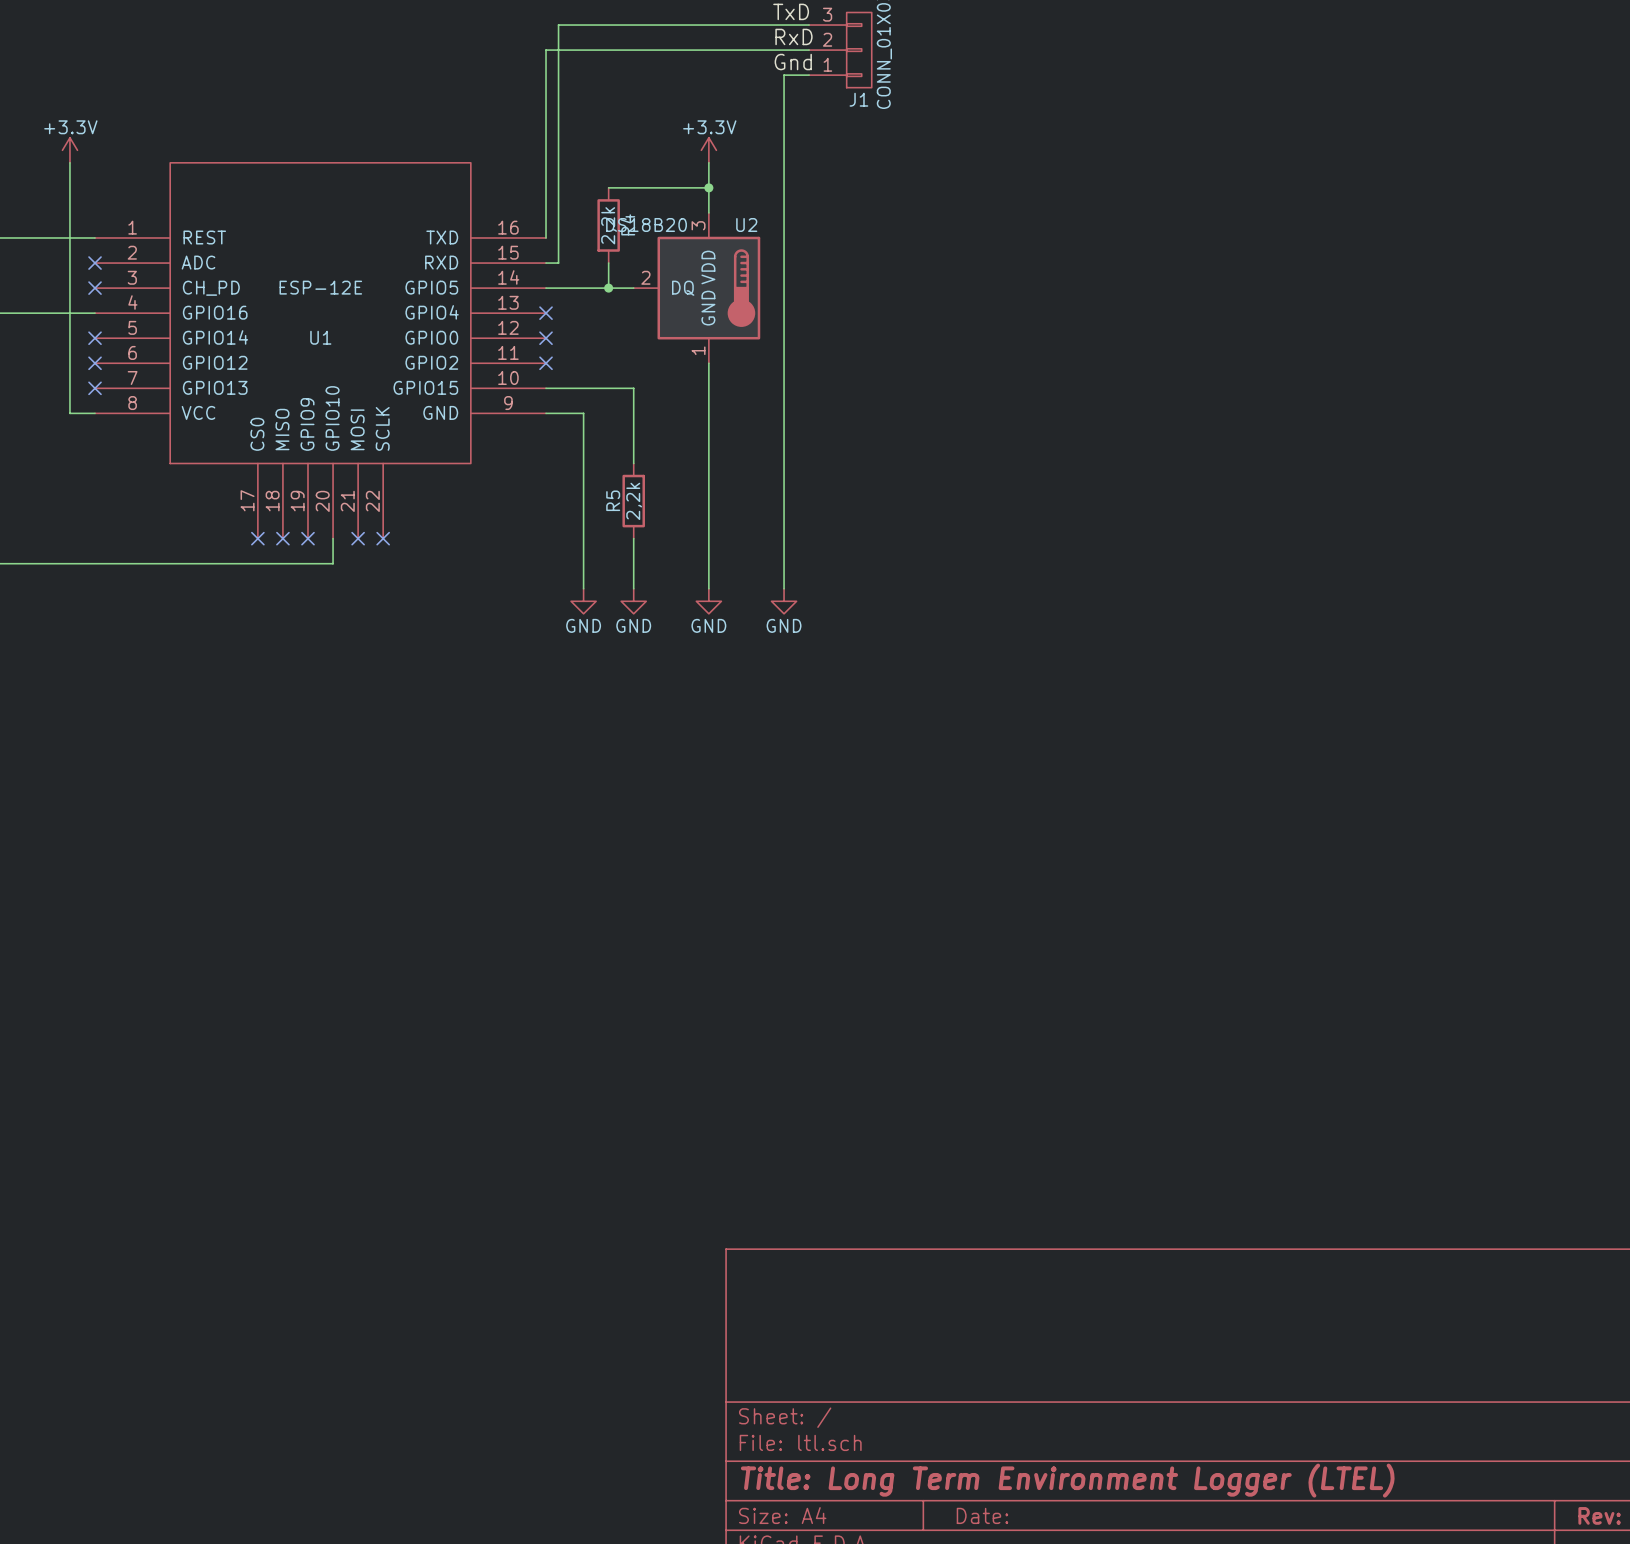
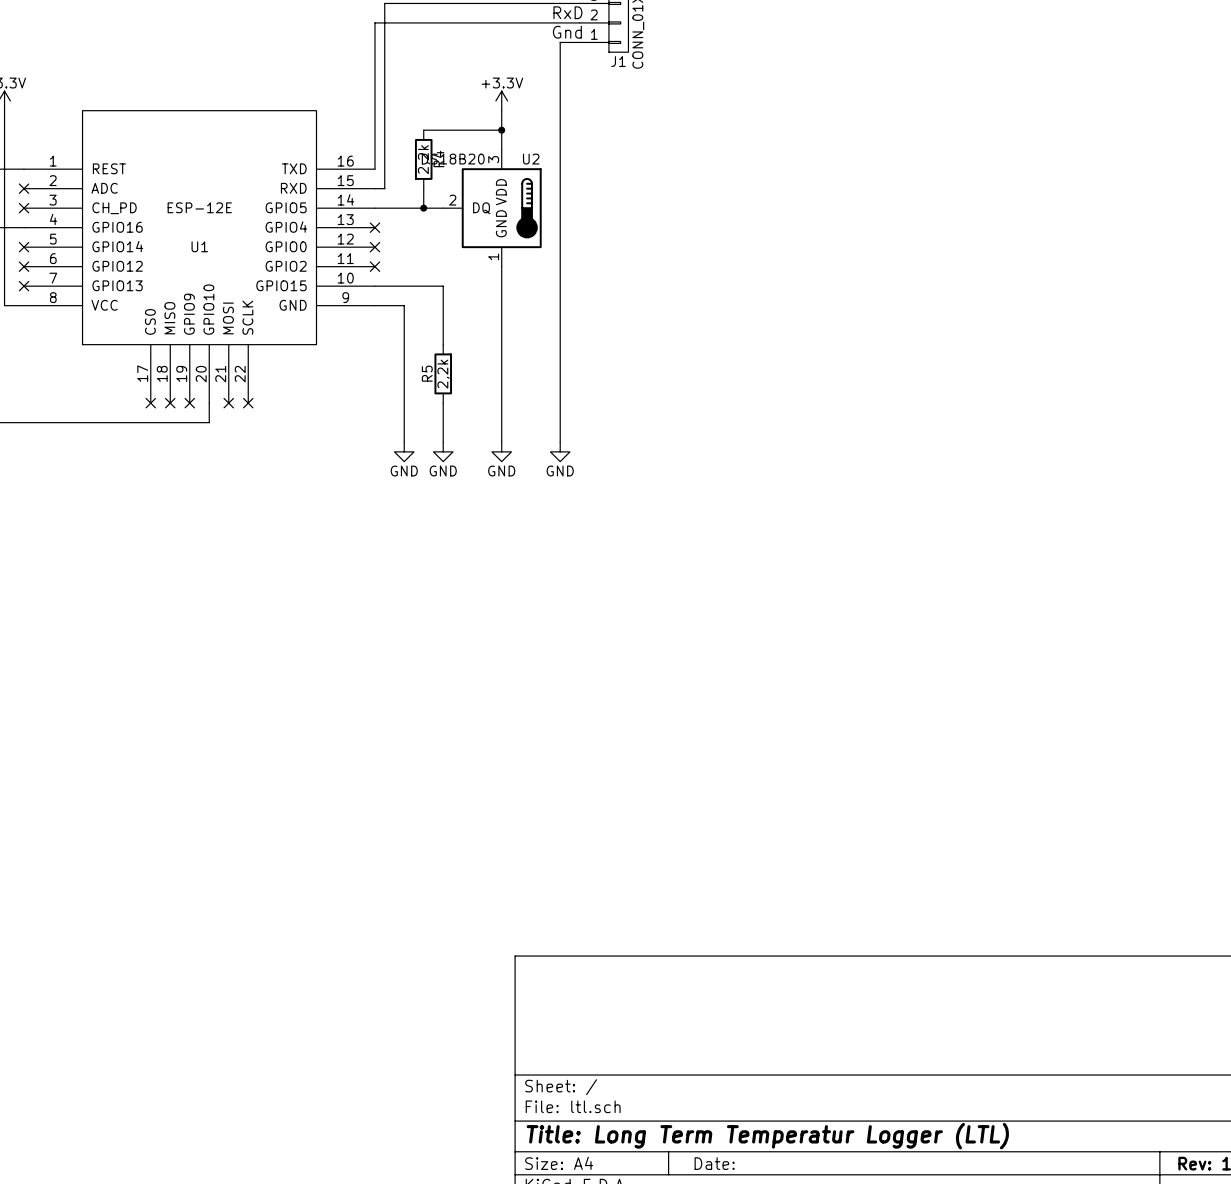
title block: Title: Long Term Environment Logger (LTEL) (1067, 1480) -> Title: Long Term Temperatur Logger (LTL) (767, 1136)

